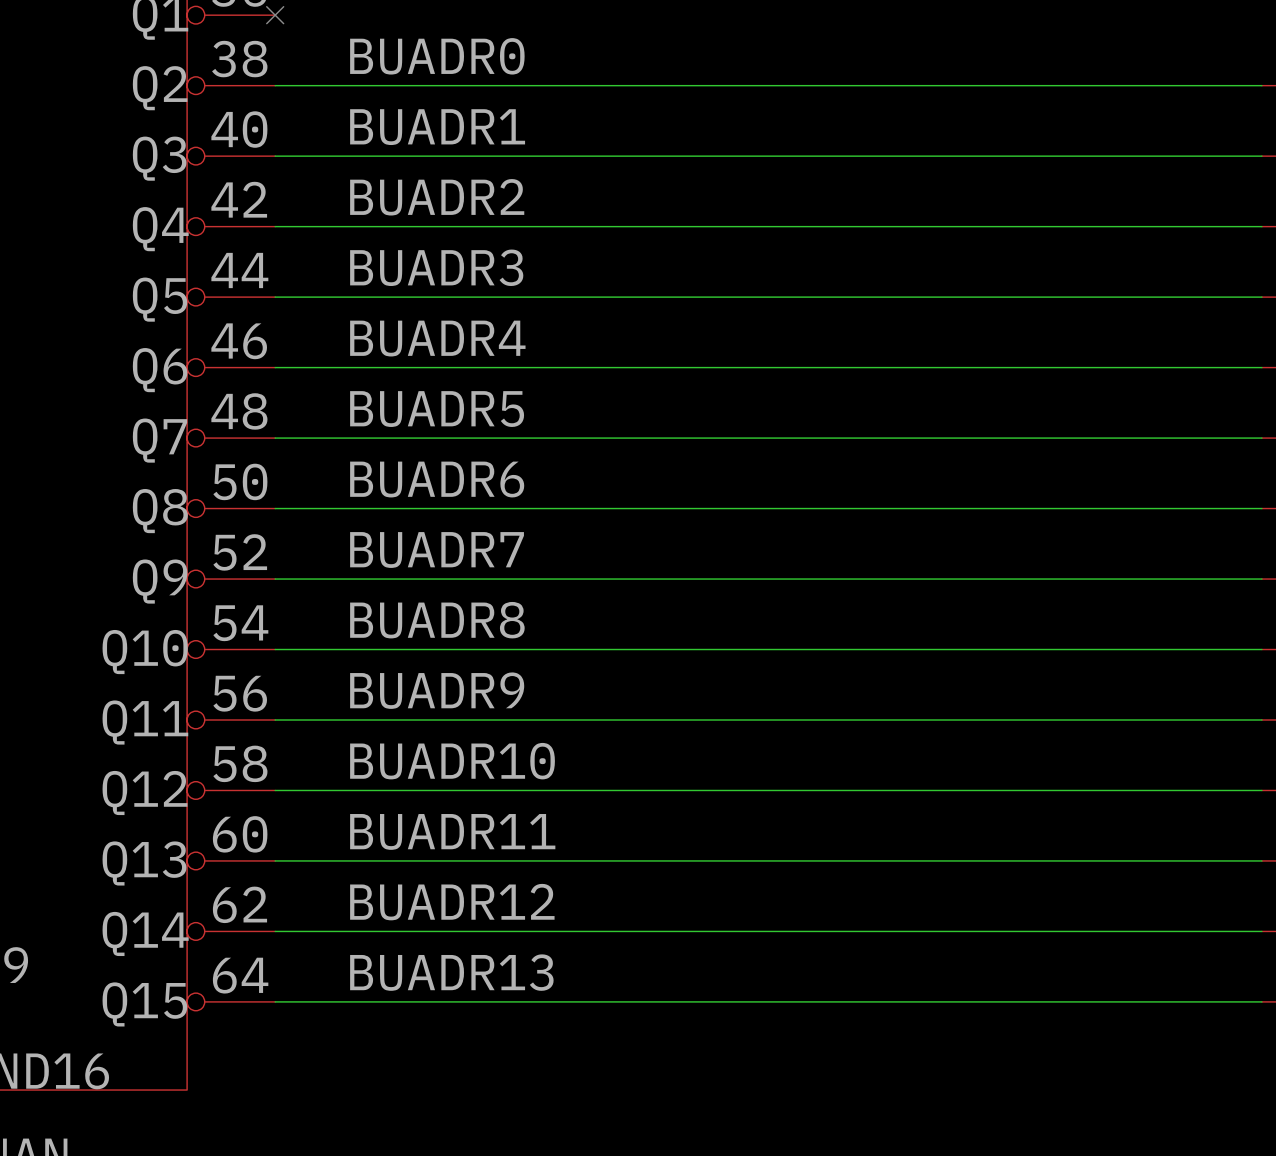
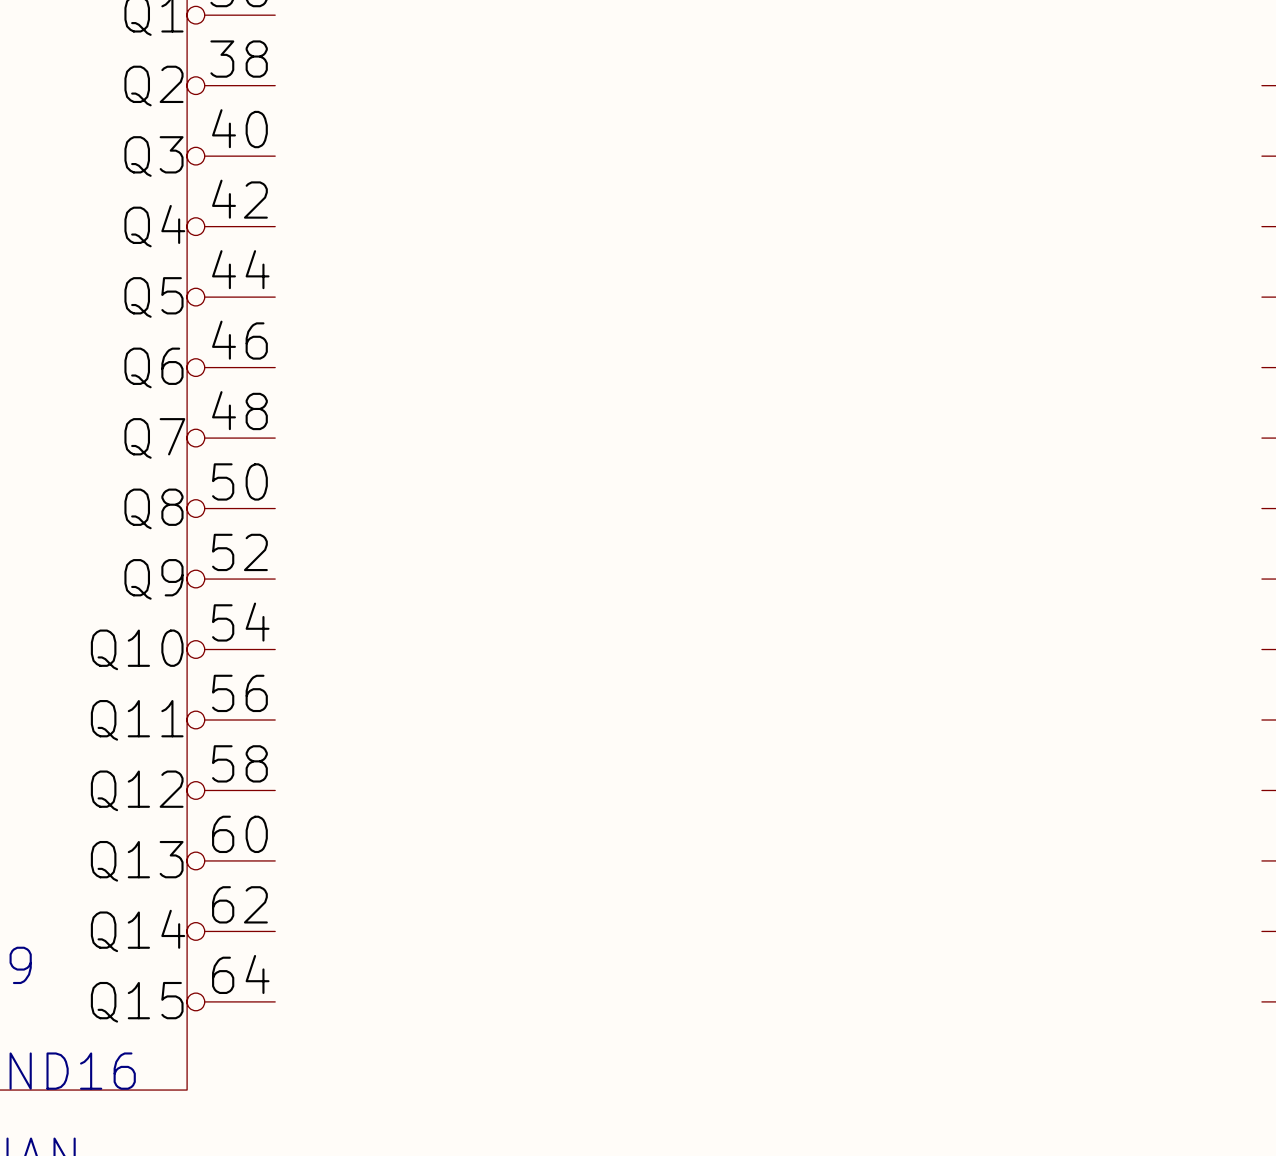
no-connect mark: (275, 15) -> none
label: BUADR0 (437, 56) -> none
wire: (275, 85) (1261, 85) -> none
label: BUADR1 (437, 127) -> none
wire: (275, 156) (1261, 156) -> none
label: BUADR2 (437, 197) -> none
wire: (275, 226) (1261, 226) -> none
label: BUADR3 (436, 267) -> none
wire: (275, 297) (1261, 297) -> none
label: BUADR4 (437, 338) -> none
wire: (275, 367) (1261, 367) -> none
label: BUADR5 (437, 409) -> none
wire: (275, 438) (1261, 438) -> none
label: BUADR6 (437, 479) -> none
wire: (275, 508) (1261, 508) -> none
label: BUADR7 (437, 550) -> none
wire: (275, 579) (1261, 579) -> none
label: BUADR8 (437, 620) -> none
wire: (275, 649) (1261, 649) -> none
label: BUADR9 (437, 690) -> none
wire: (275, 720) (1261, 720) -> none
label: BUADR10 (452, 761) -> none
wire: (275, 790) (1261, 790) -> none
label: BUADR11 (452, 831) -> none
wire: (275, 860) (1261, 860) -> none
label: BUADR12 (452, 902) -> none
wire: (275, 931) (1261, 931) -> none
label: BUADR13 (451, 972) -> none
wire: (275, 1001) (1261, 1001) -> none

